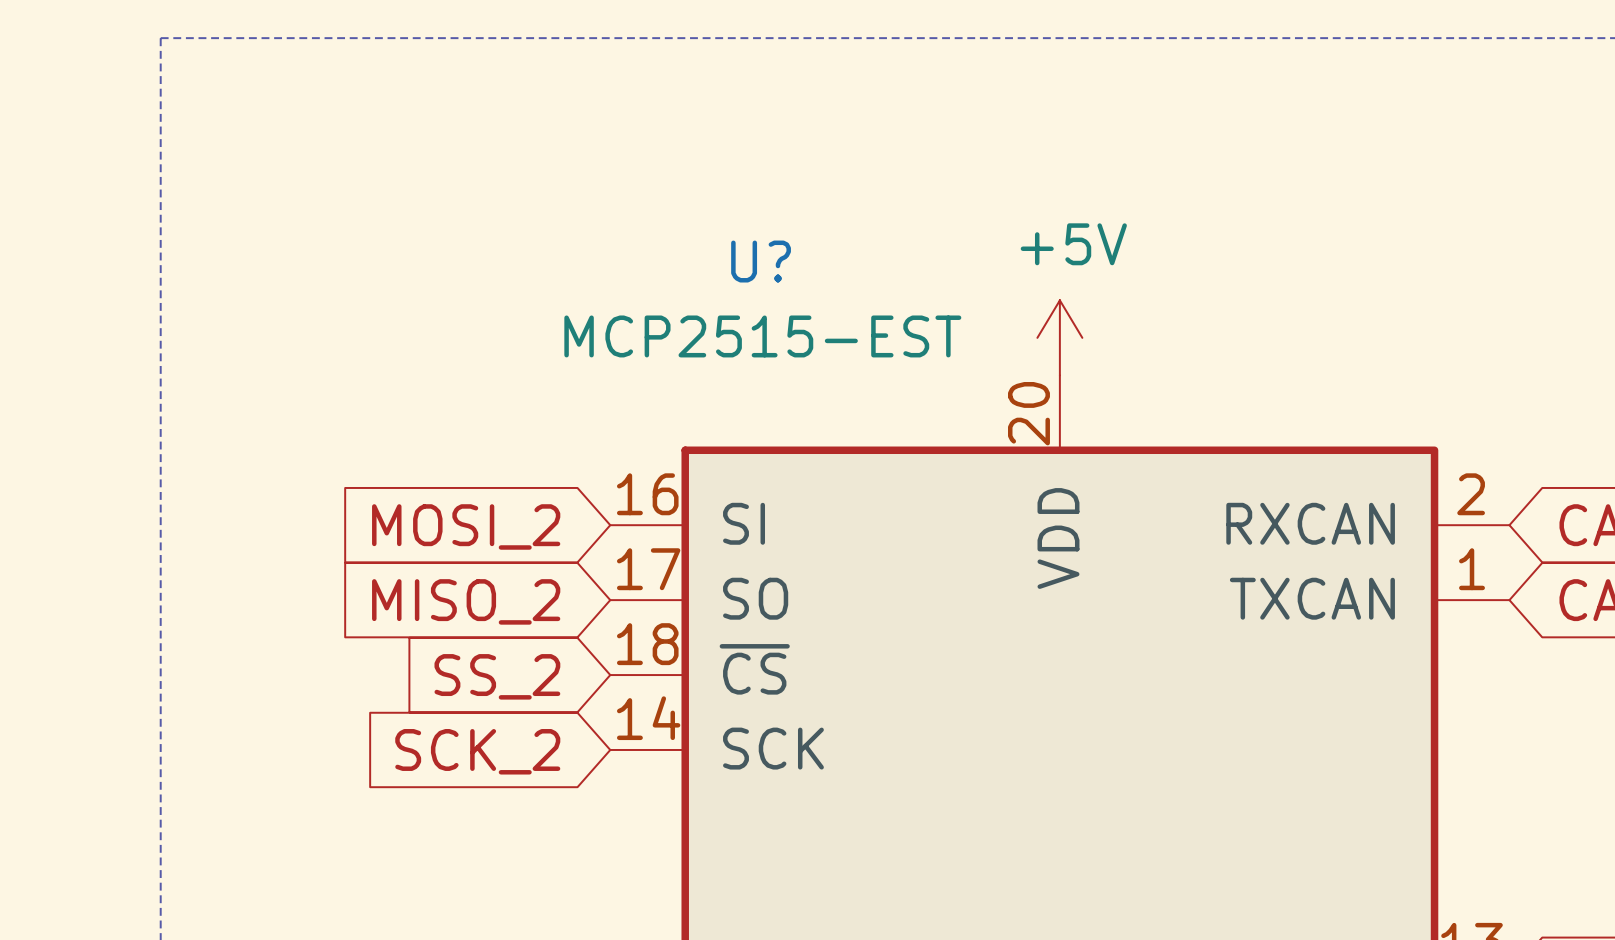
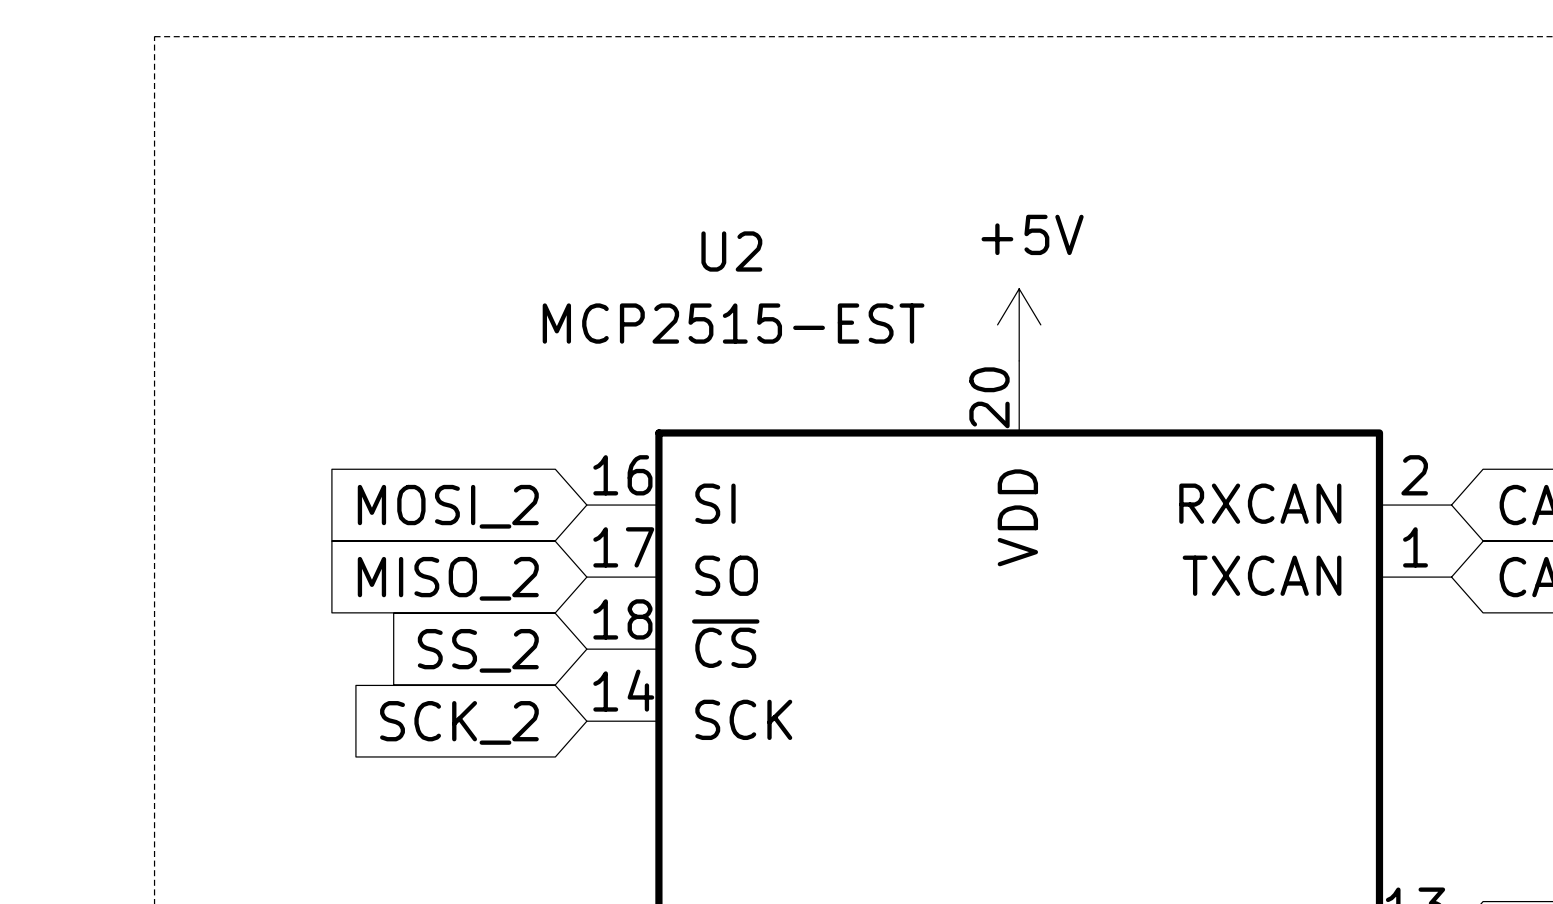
U? name: U? (761, 261) -> U2 (731, 251)

